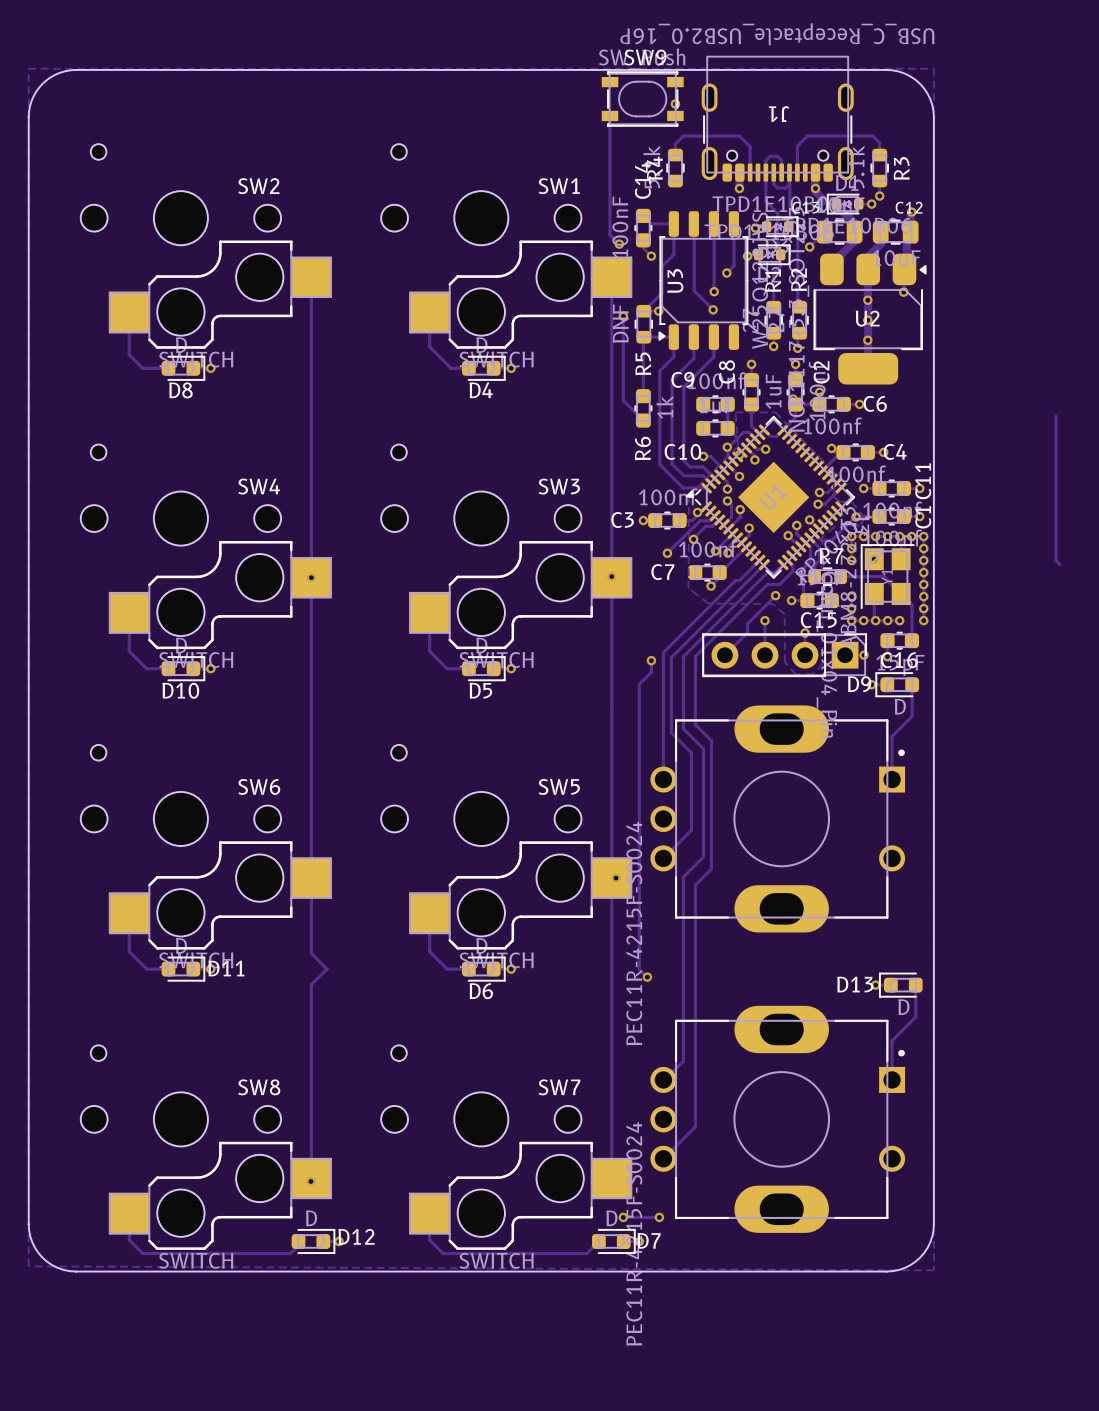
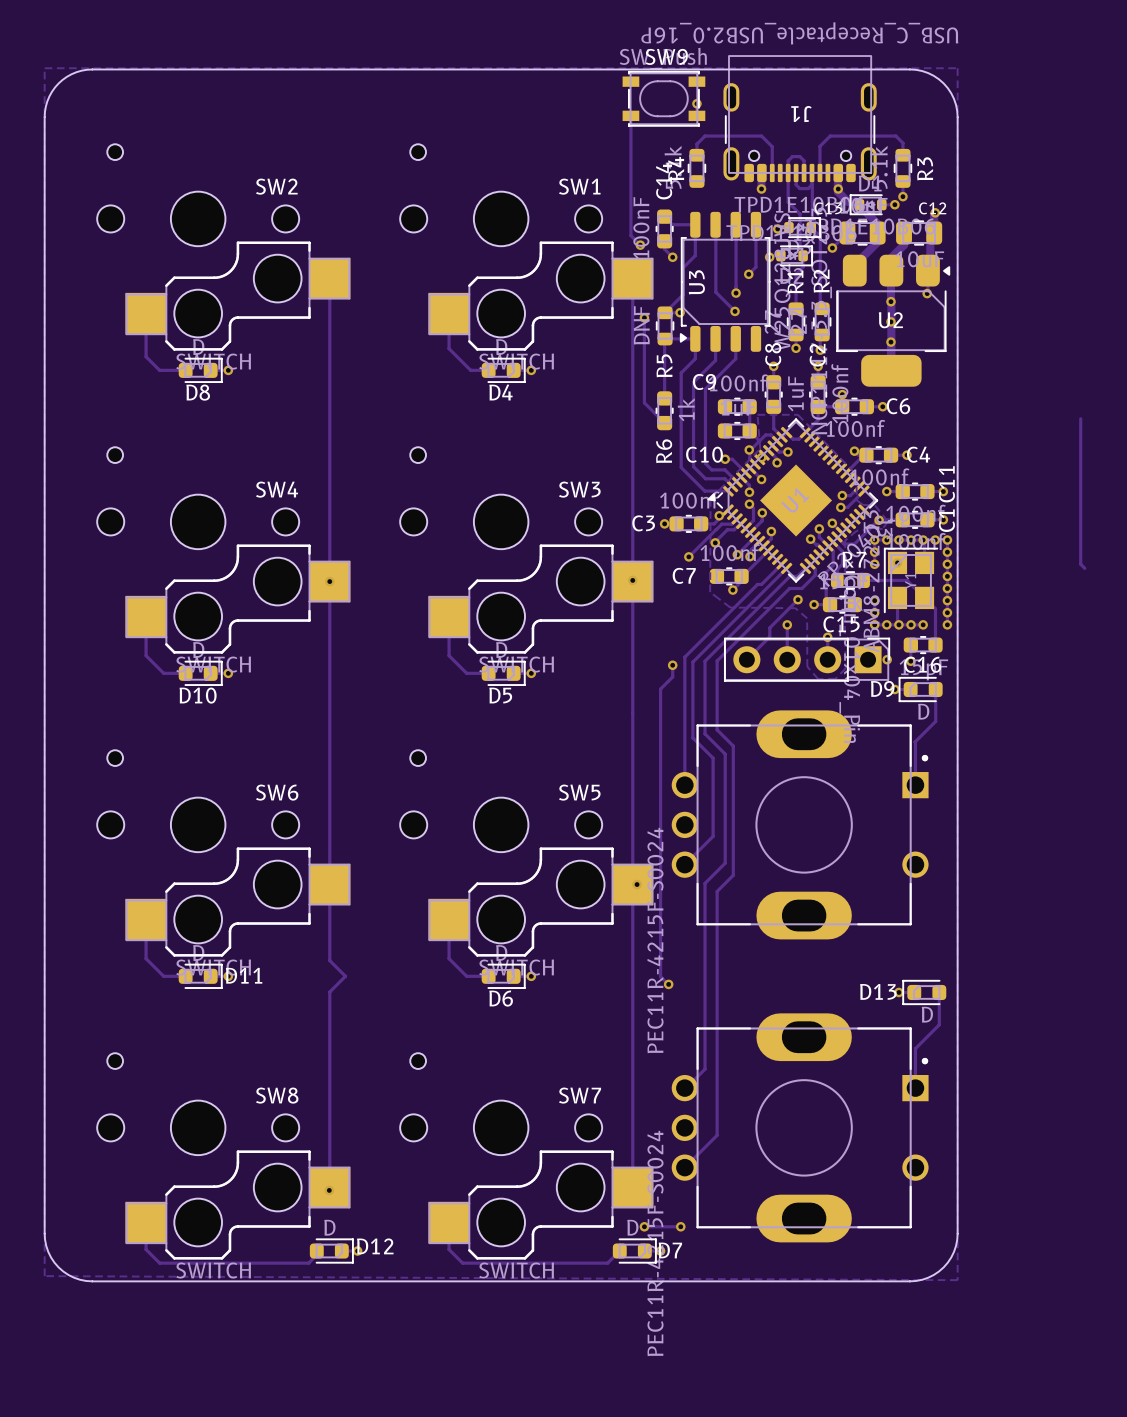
C8 name position: C8 (726, 371) -> C8 (773, 354)
C2 name position: C2 (821, 372) -> C2 (817, 355)

